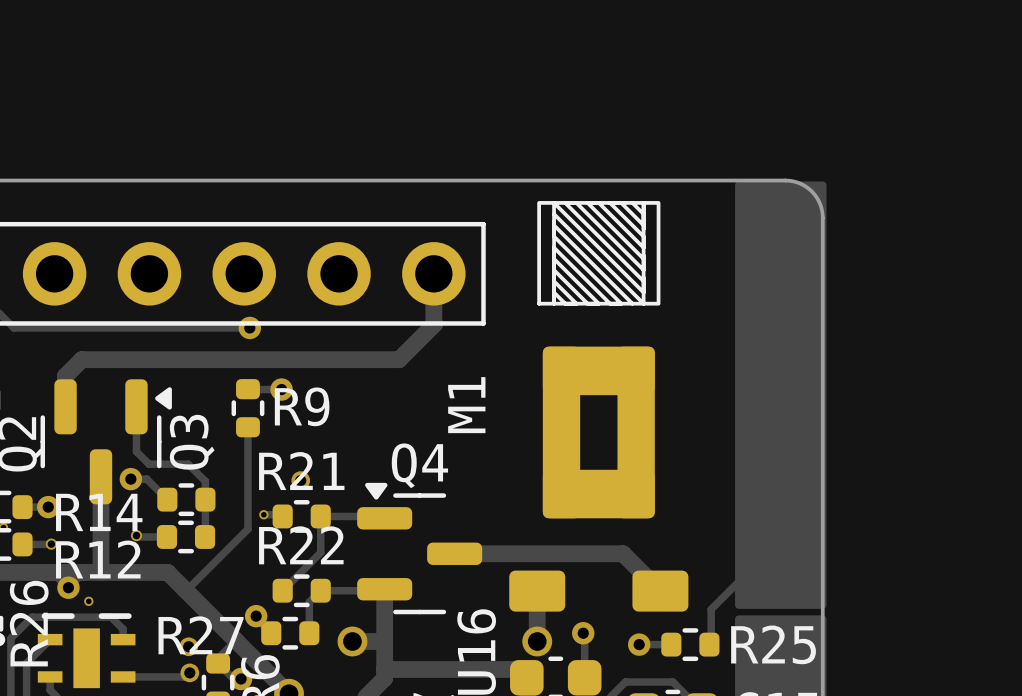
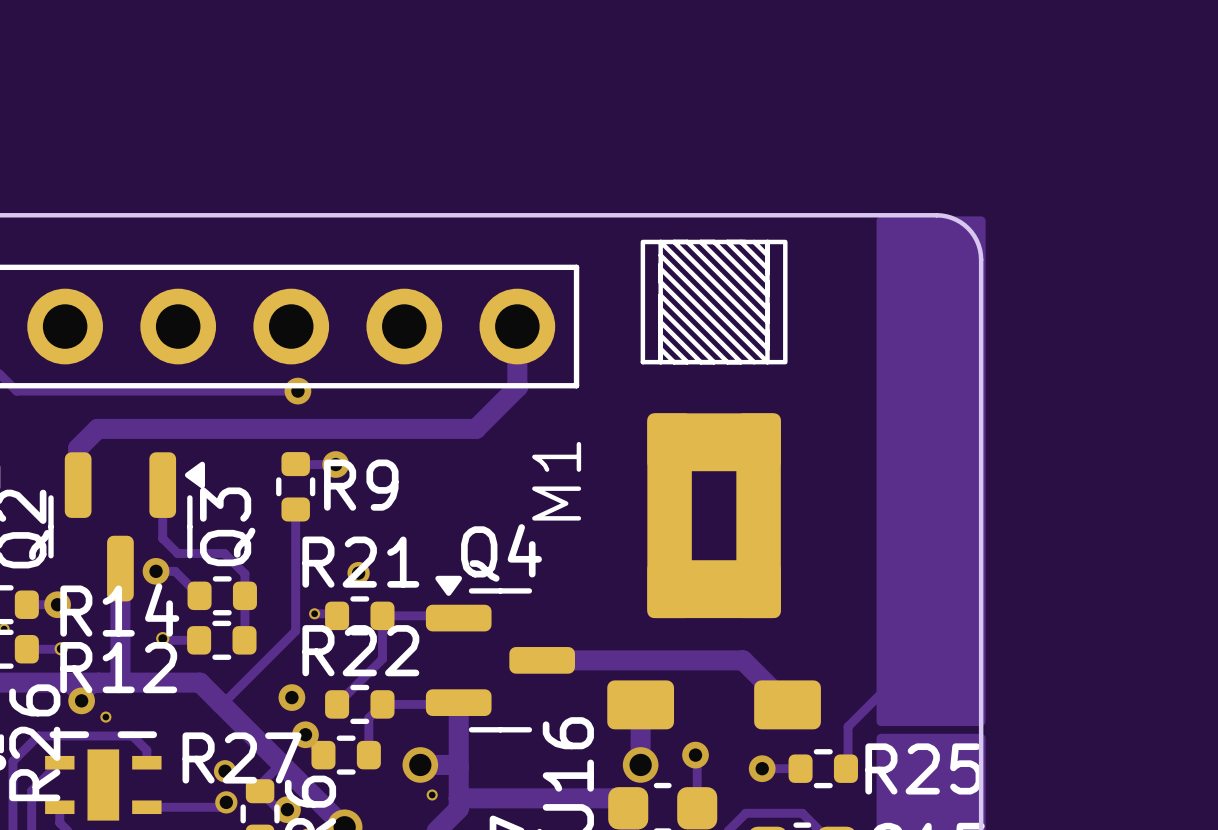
via: none -> (291, 697)
via: none -> (432, 794)

